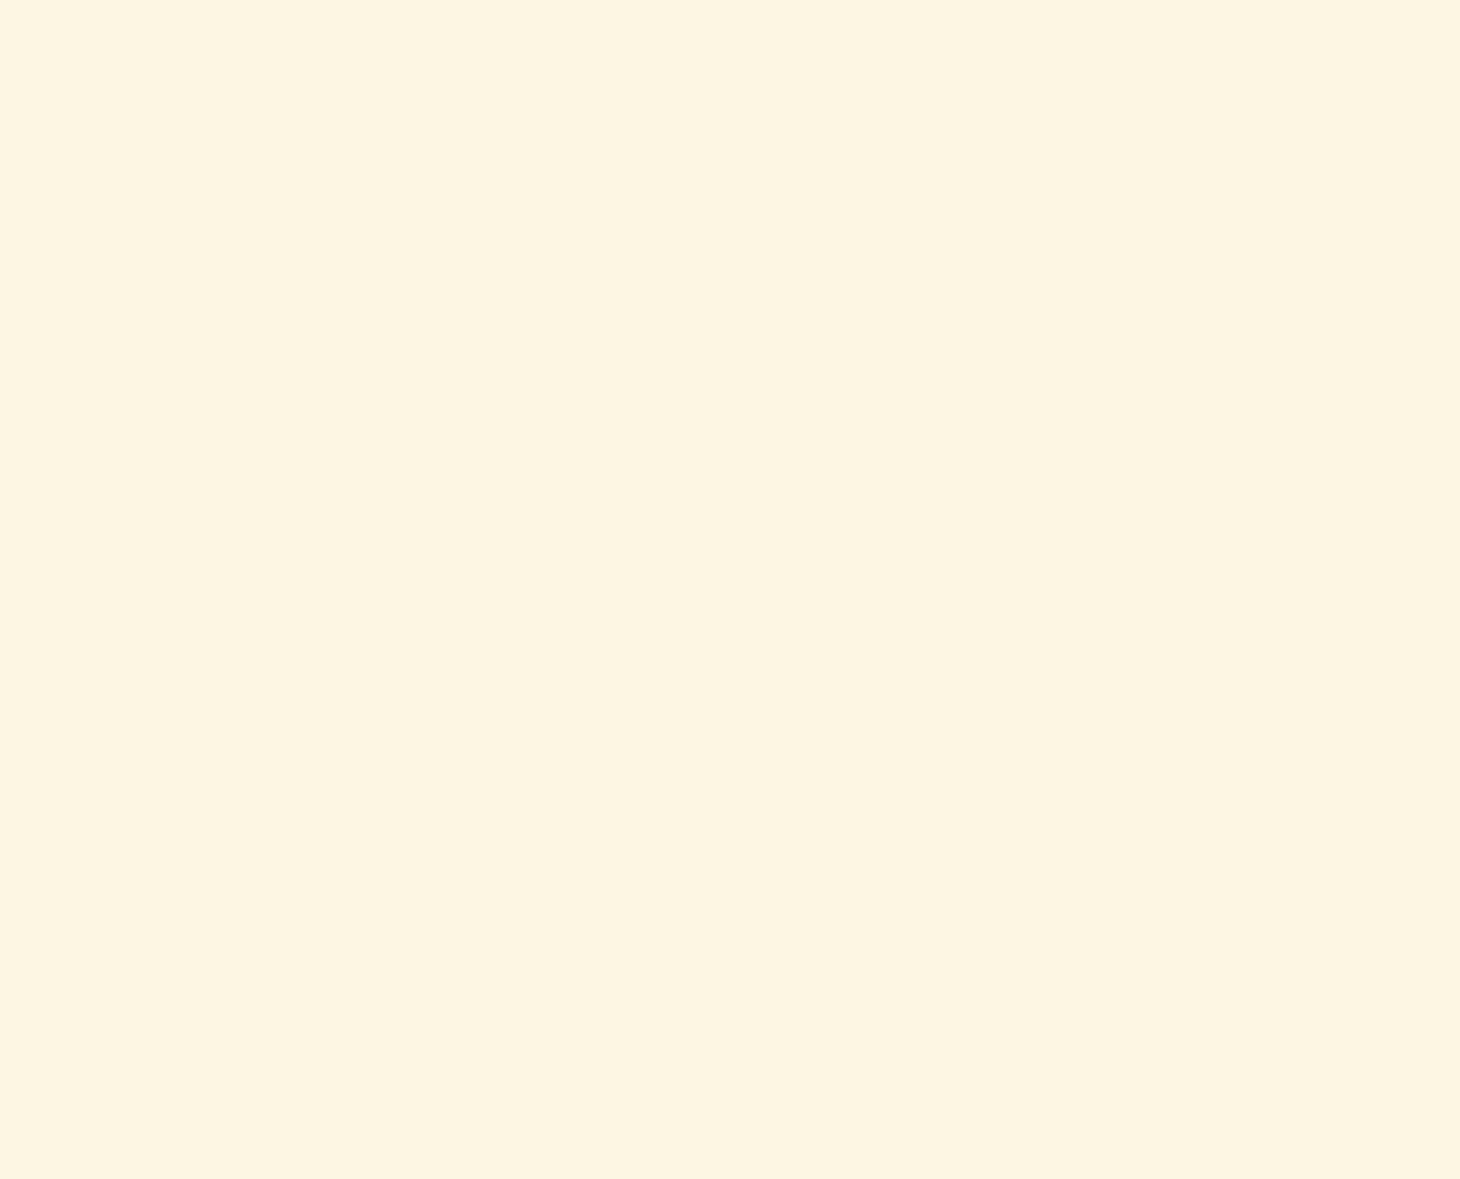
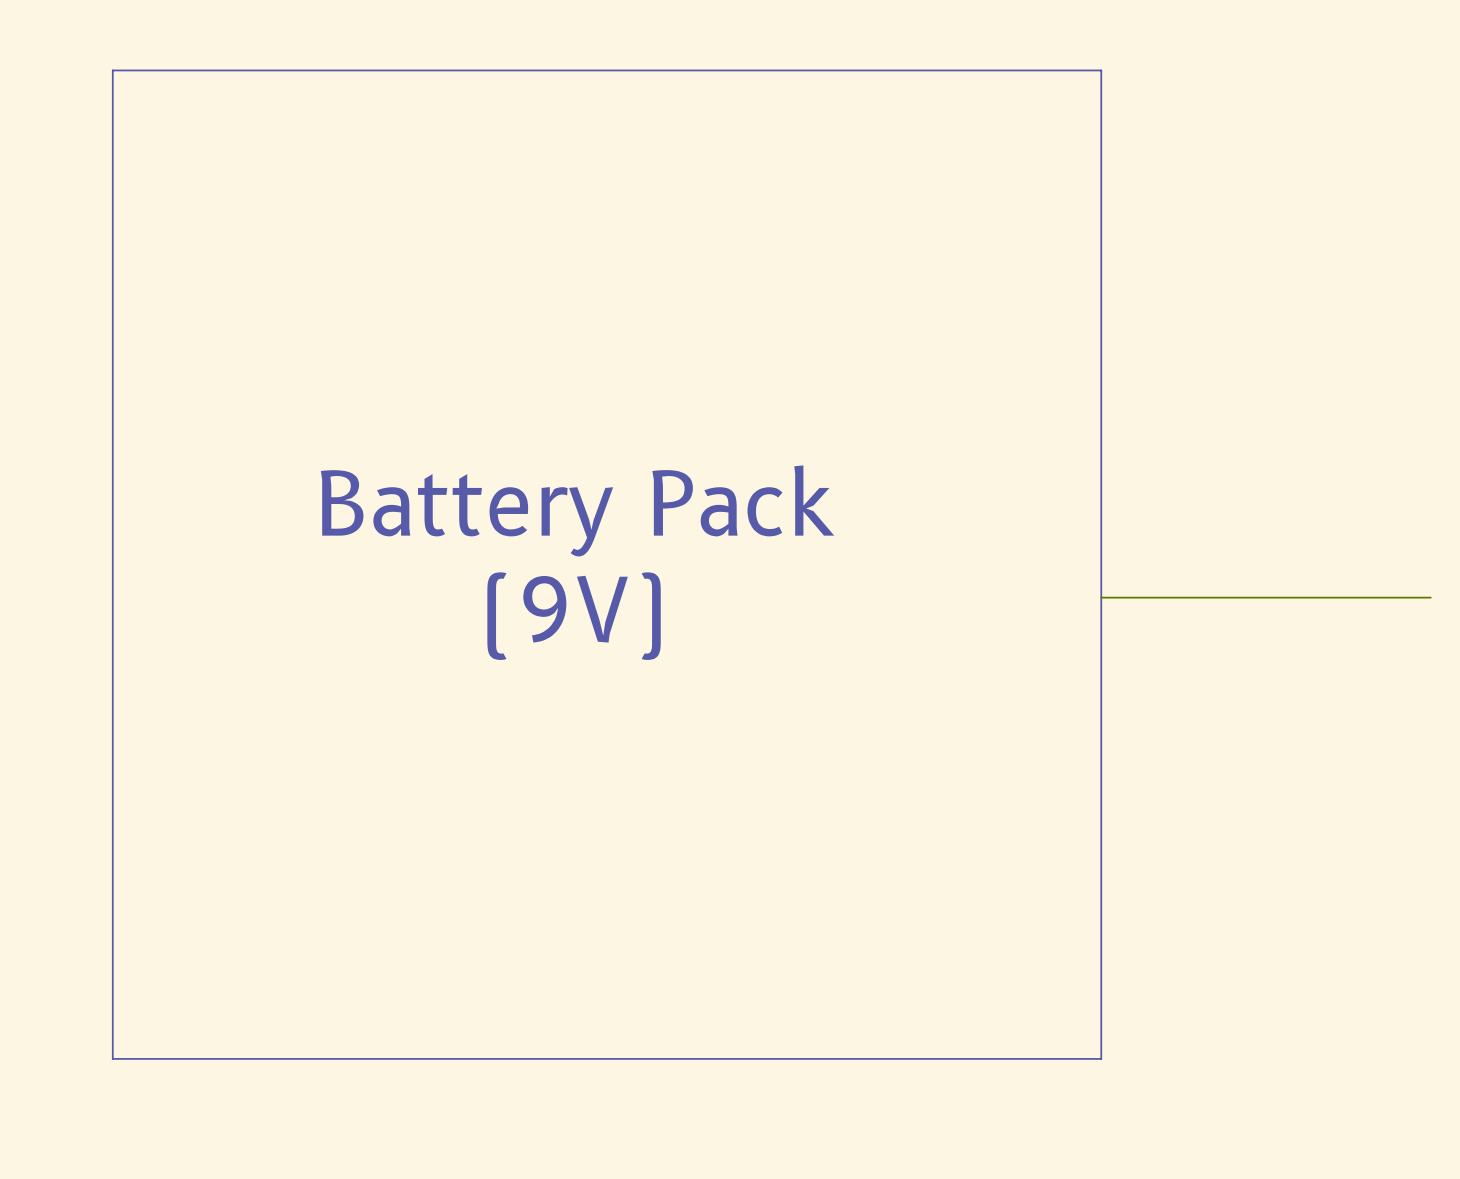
line: none -> (112, 70) (1101, 70) (1101, 1058) (112, 1058) (112, 70)
text: none -> Battery Pack (577, 510)
wire: none -> (1101, 597) (1430, 597)
text: none -> (9V) (574, 616)

